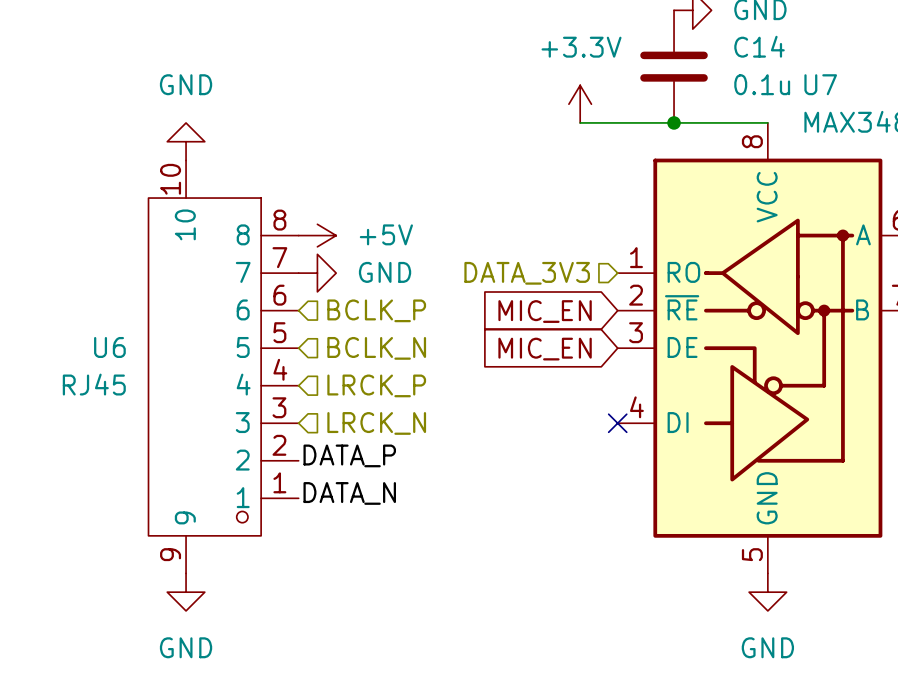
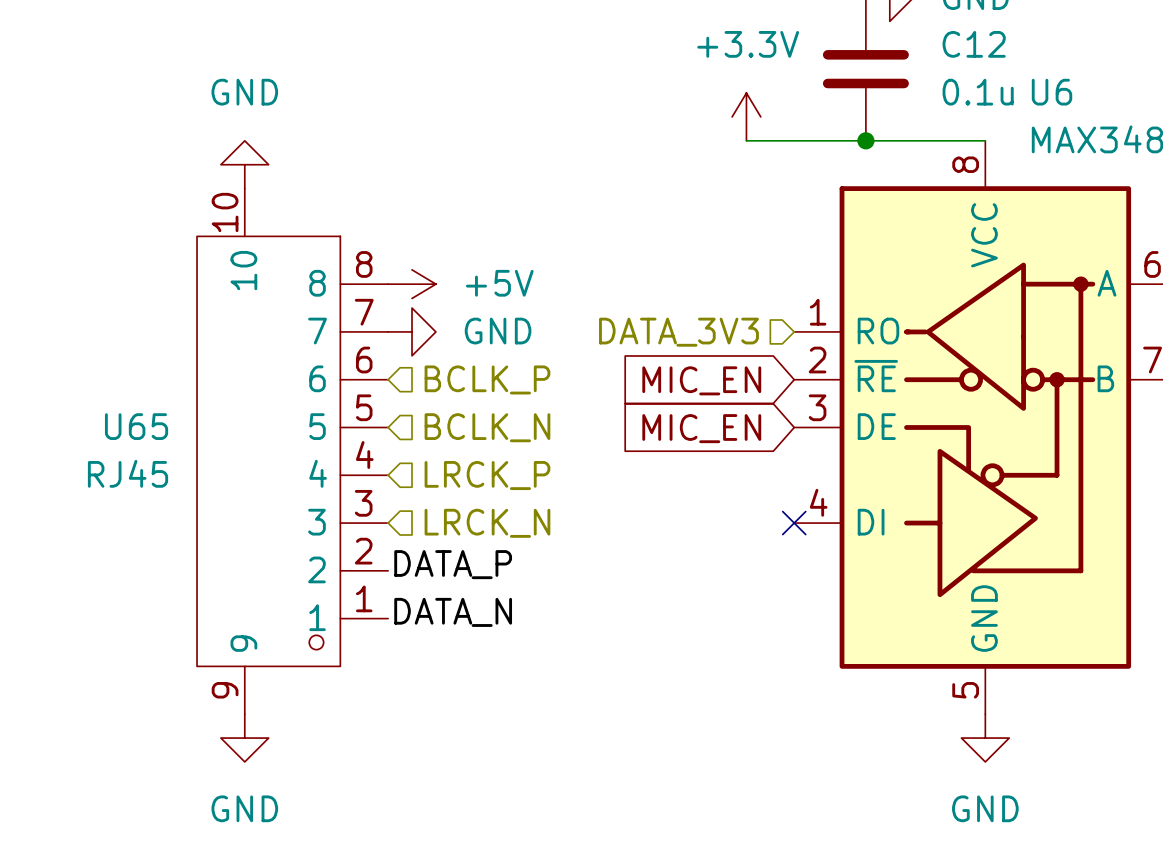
C14 name: C14 (759, 46) -> C12 (974, 44)
U7 name: U7 (820, 84) -> U6 (1052, 92)
U6 name: U6 (109, 347) -> U65 (136, 426)

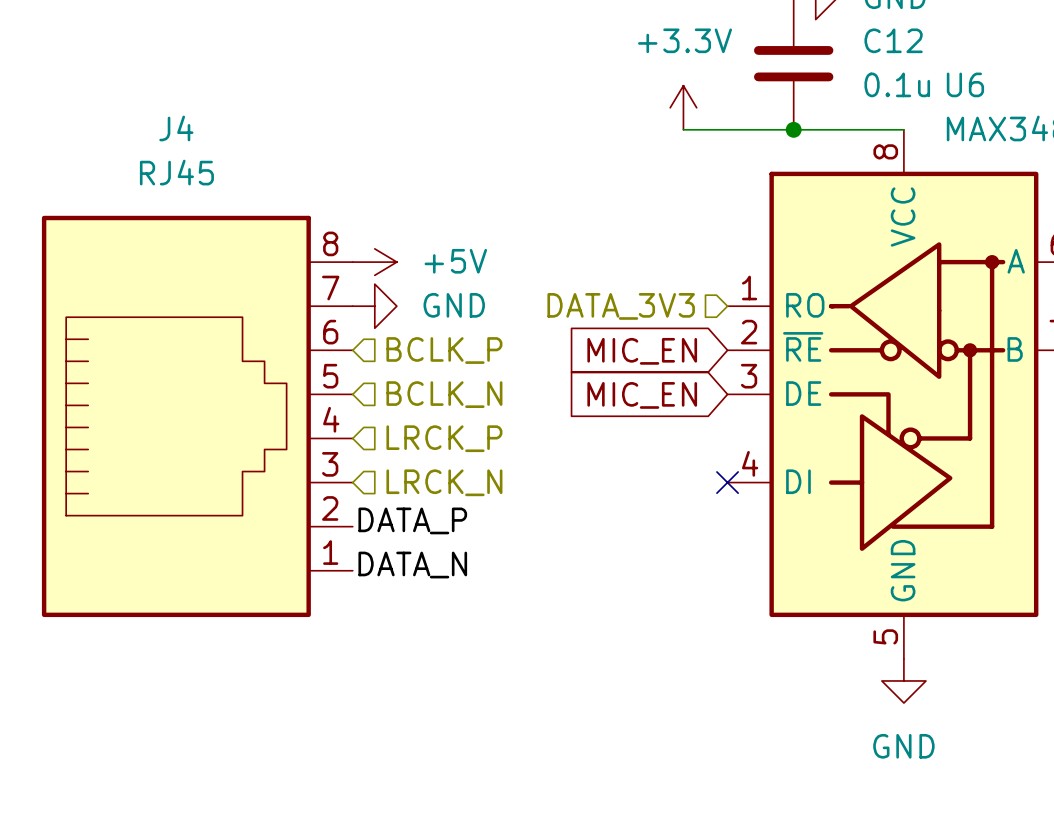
power symbol: GND (244, 164) -> none
J4: none -> RJ45 (197, 416)
U65: RJ45 (292, 451) -> none
power symbol: GND (244, 738) -> none

